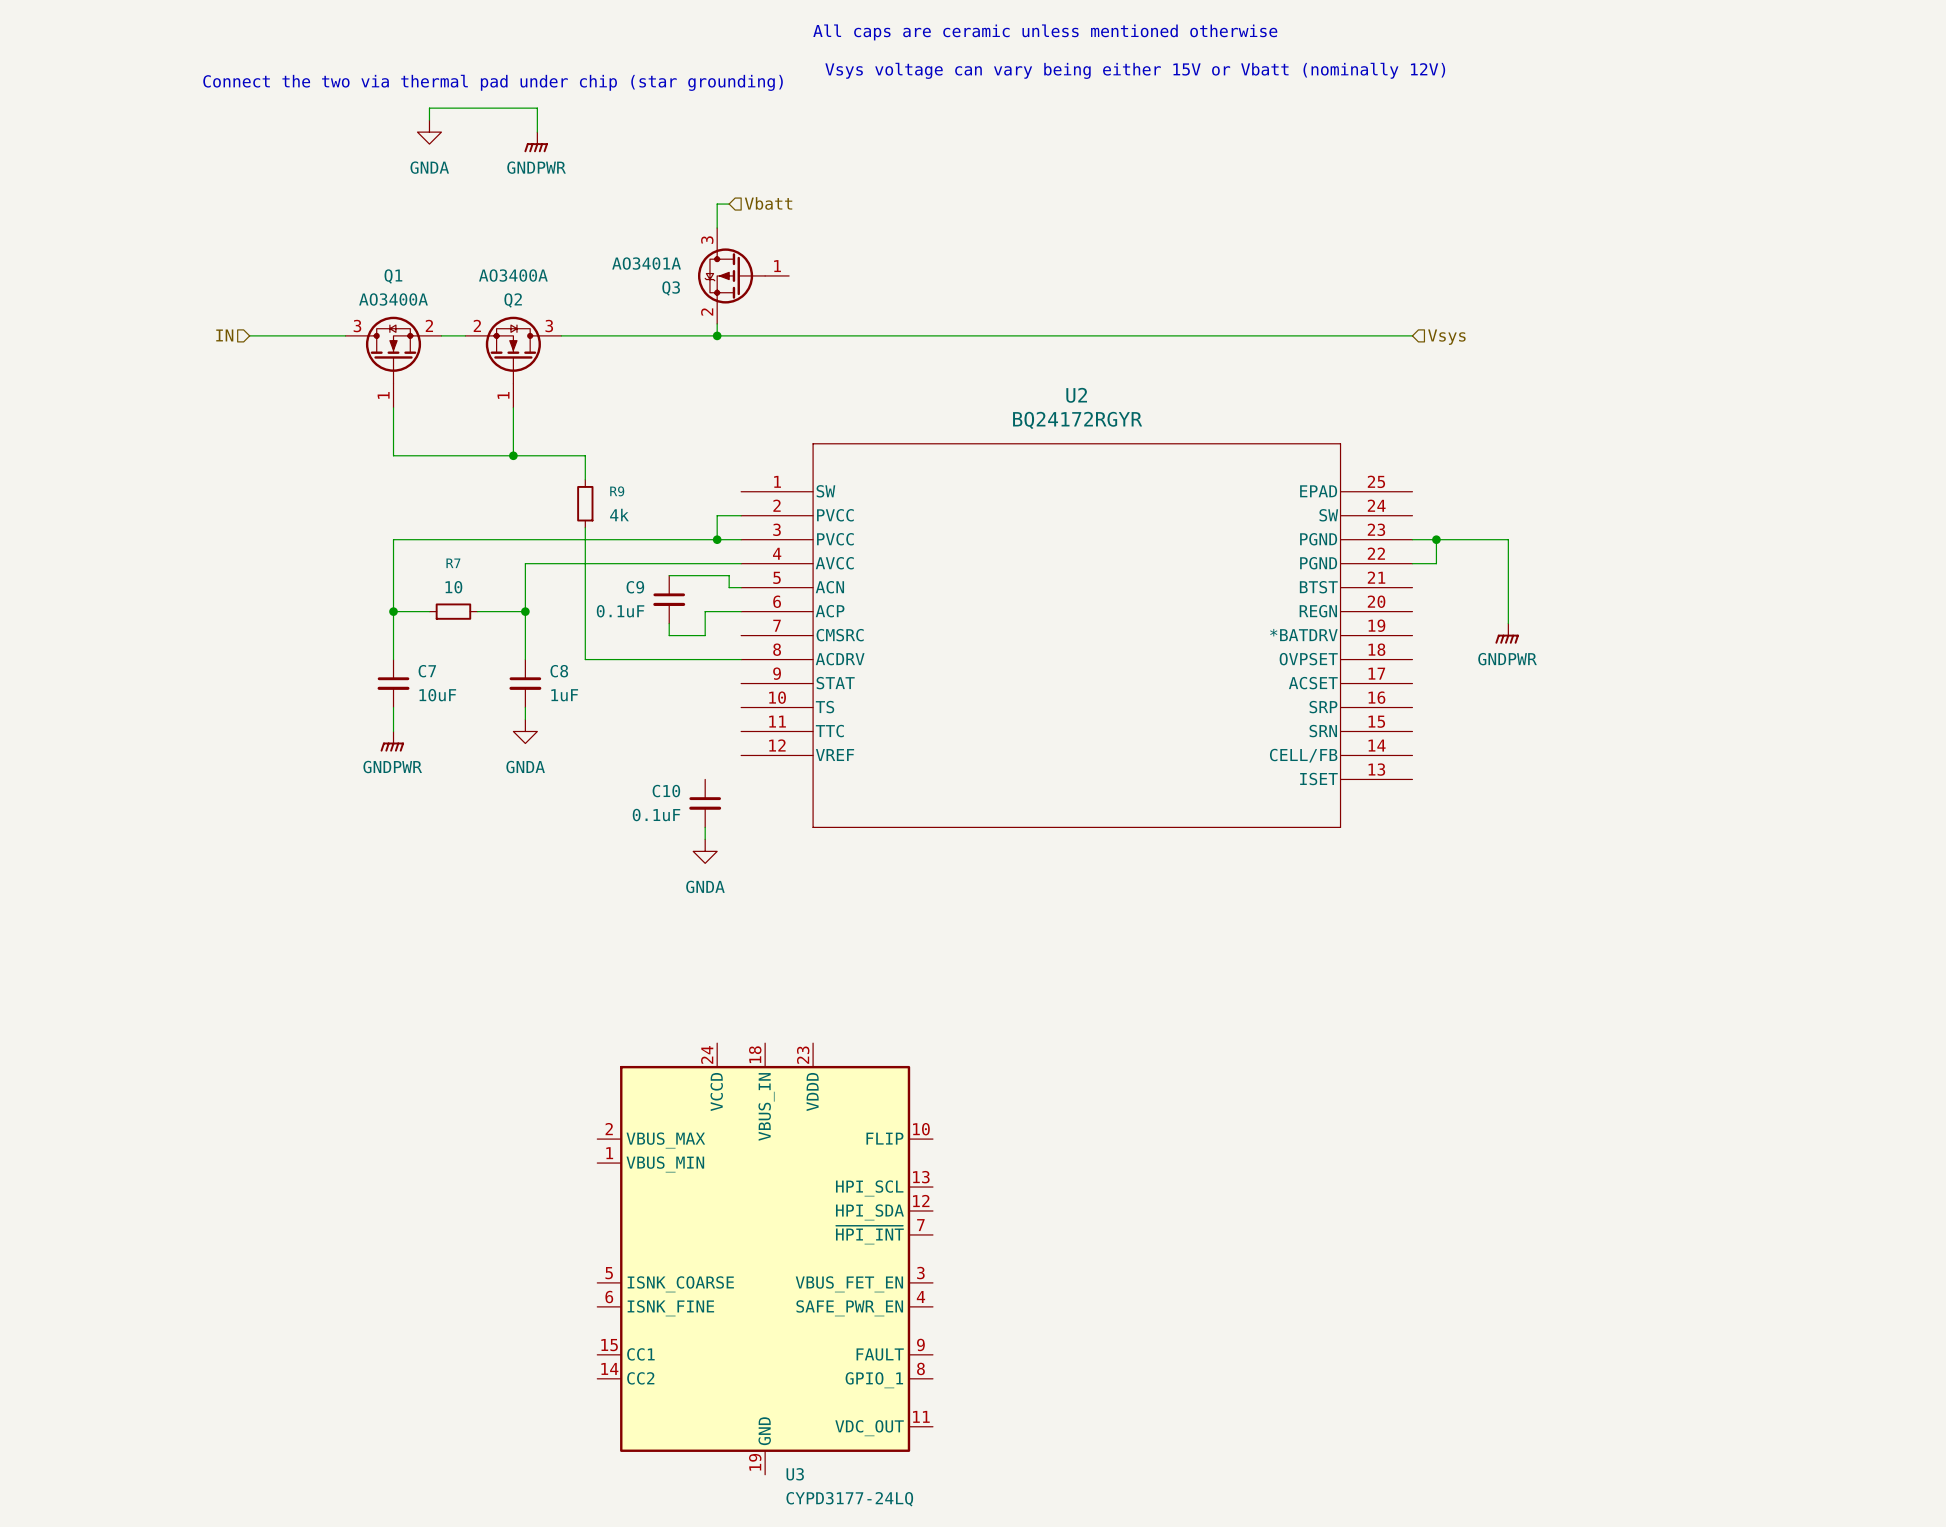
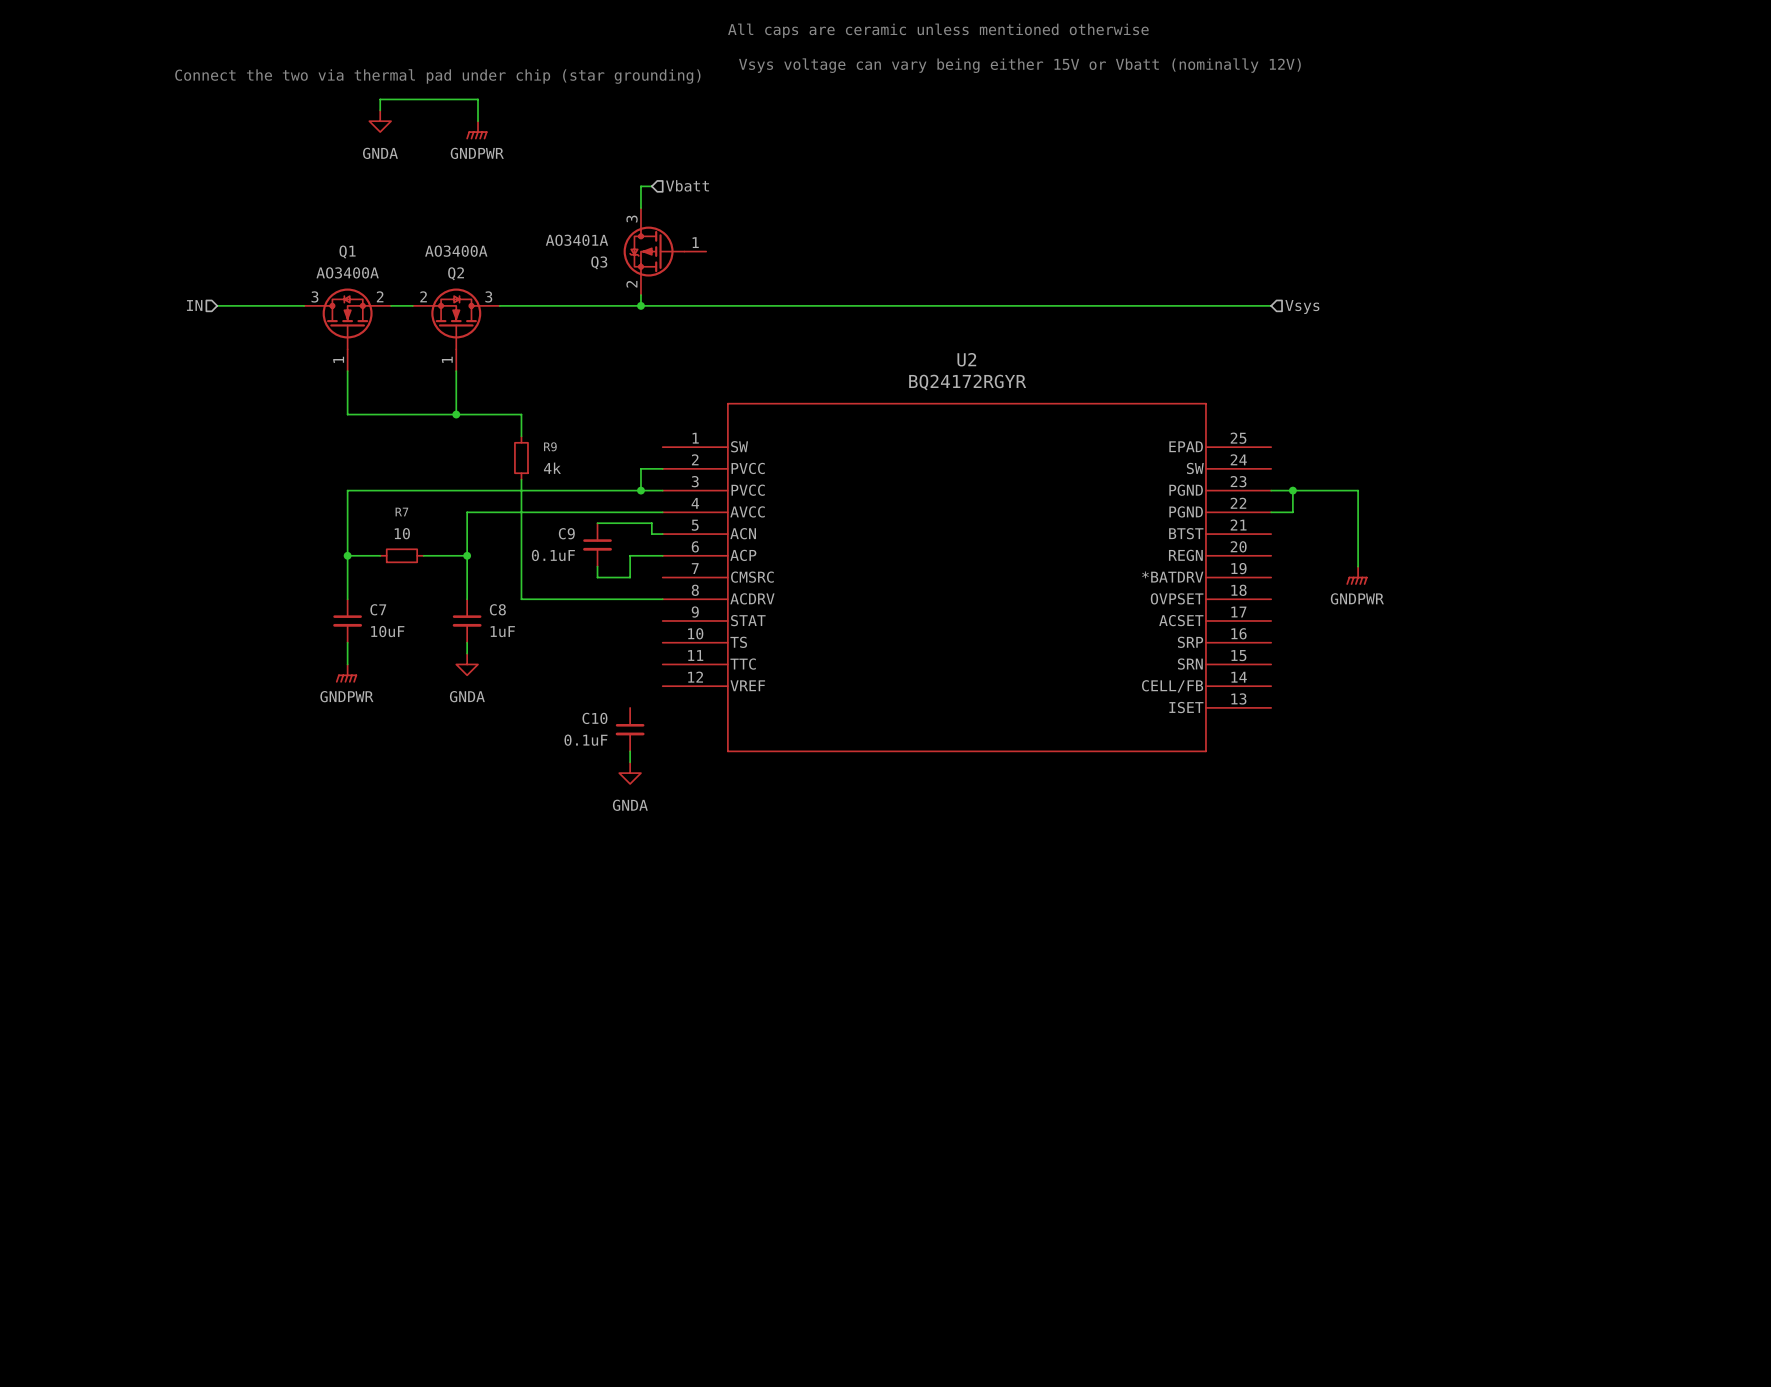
U3: CYPD3177-24LQ (765, 1258) -> none

